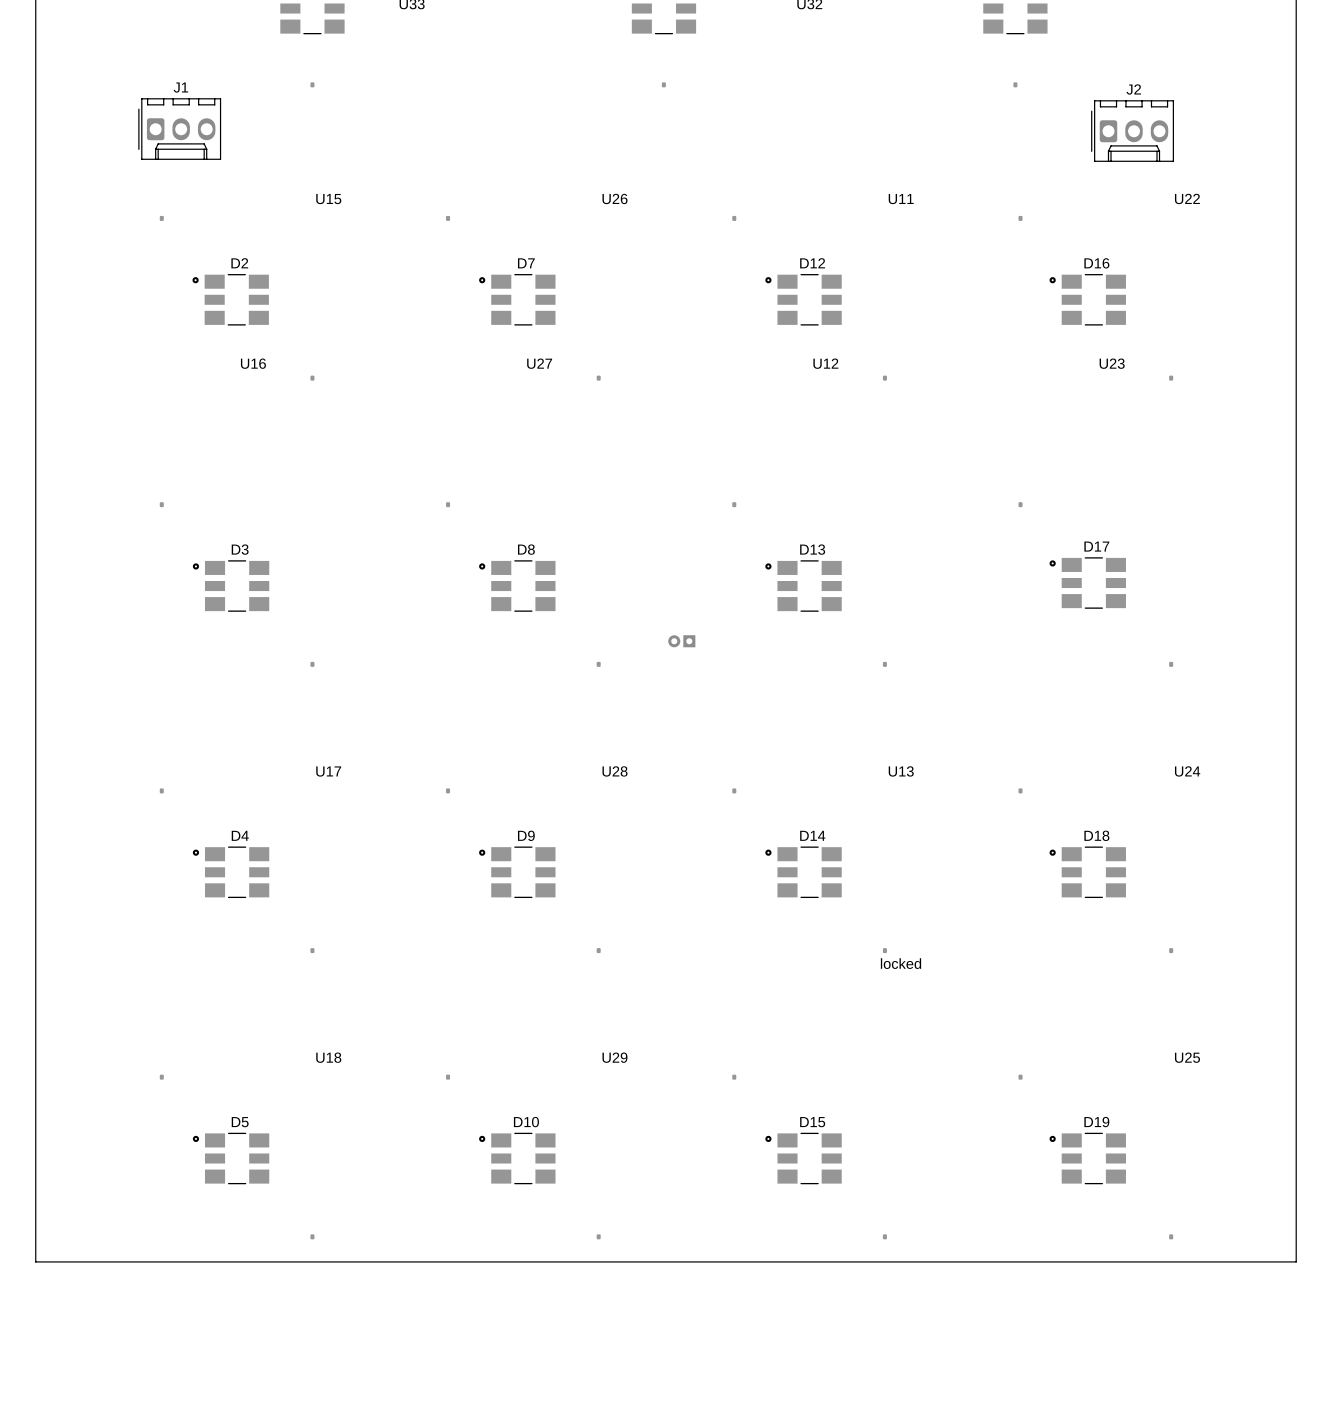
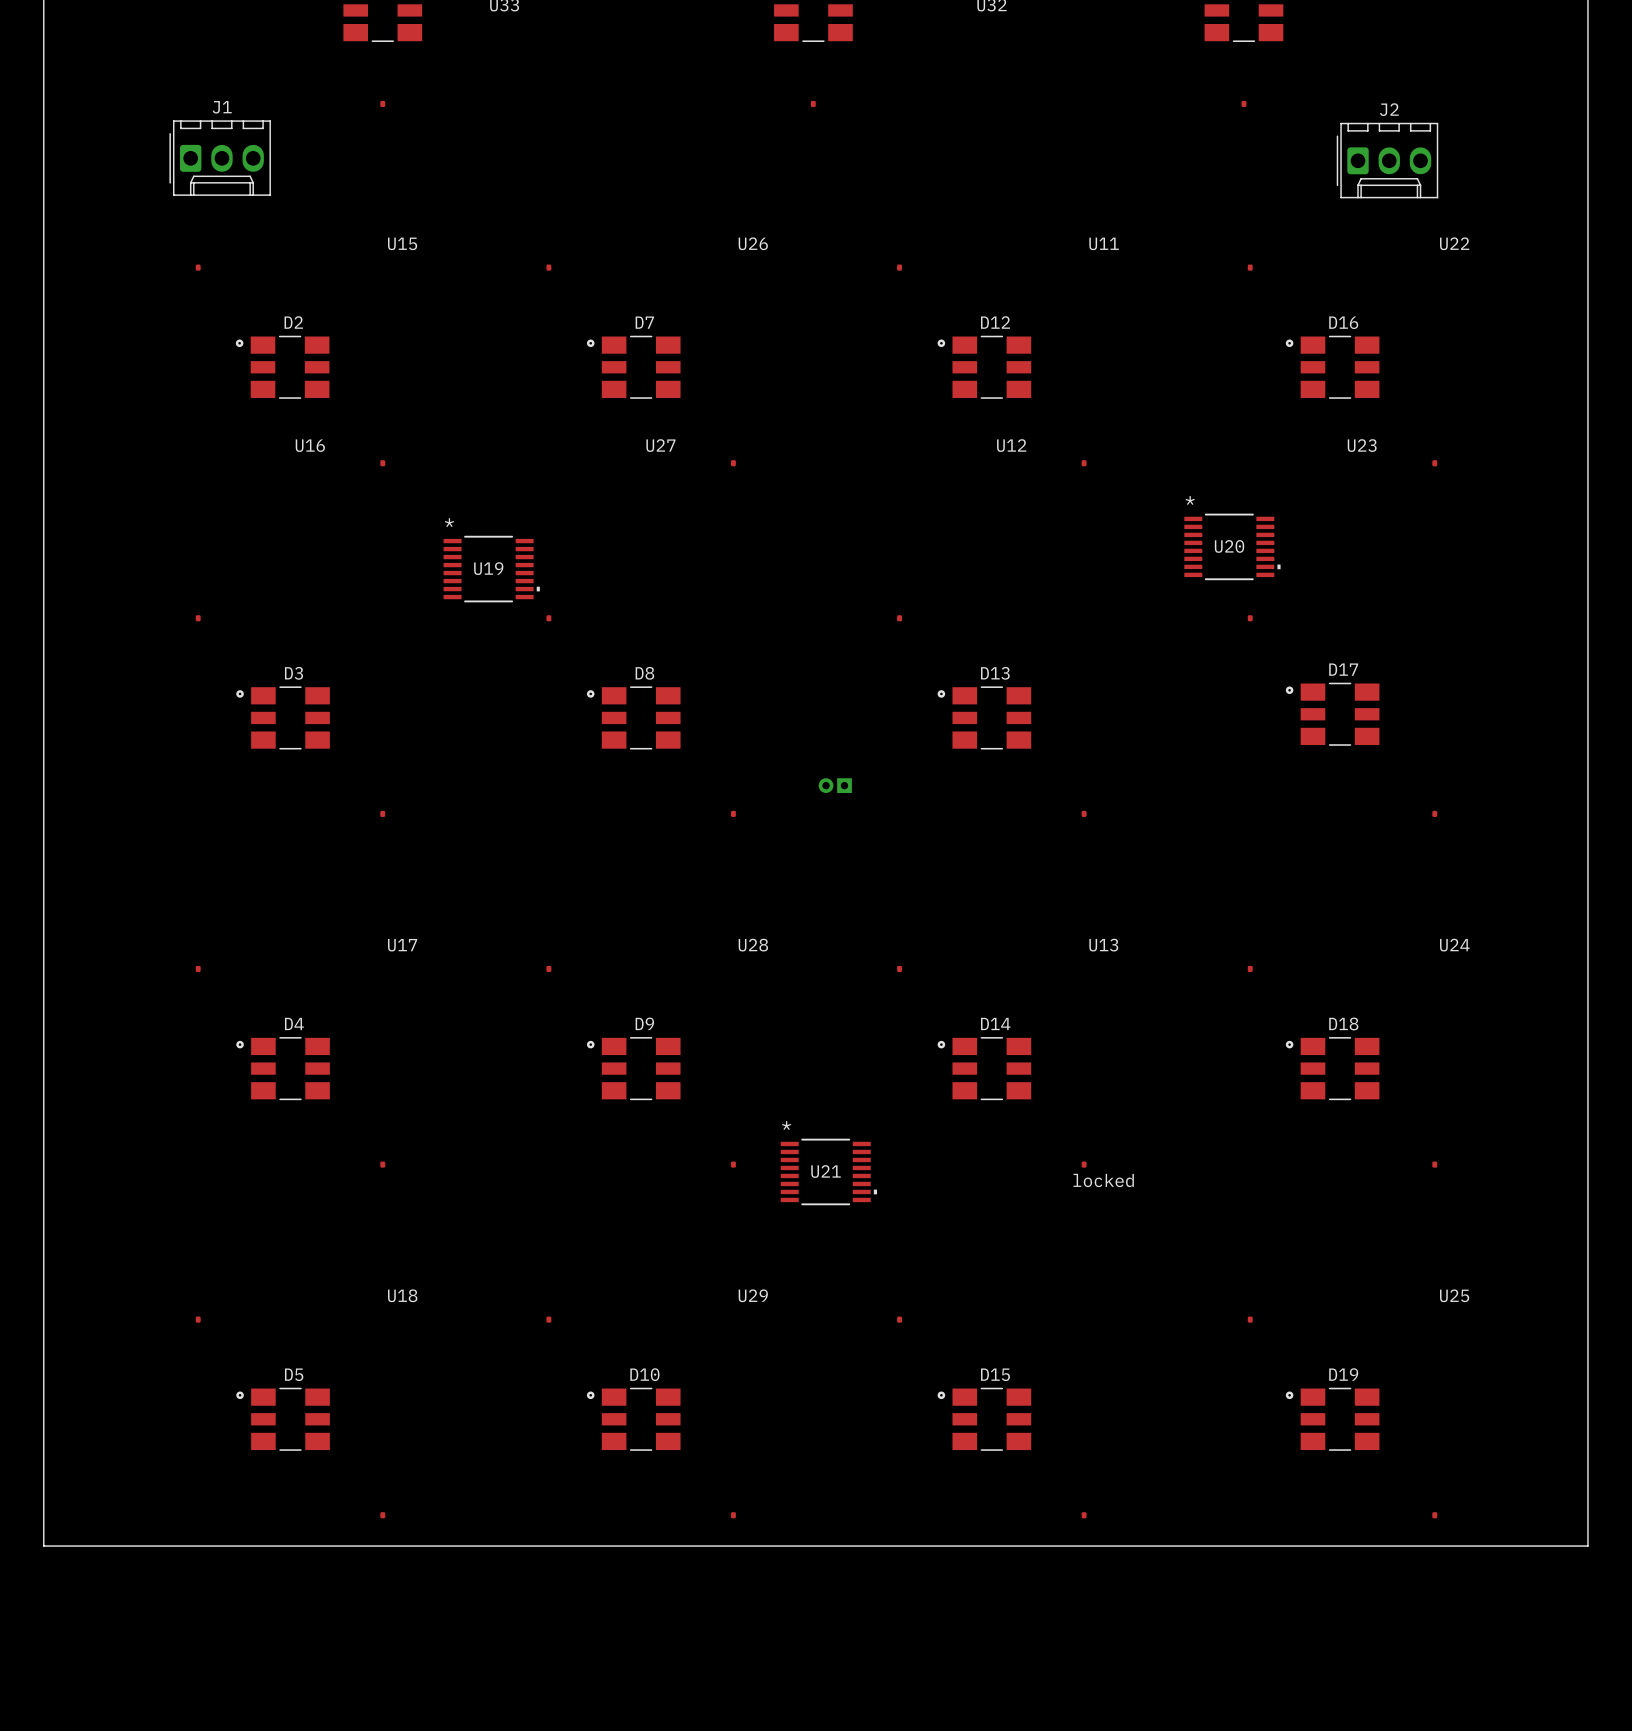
U20: none -> (1232, 546)
U19: none -> (491, 569)
U21: none -> (828, 1171)

